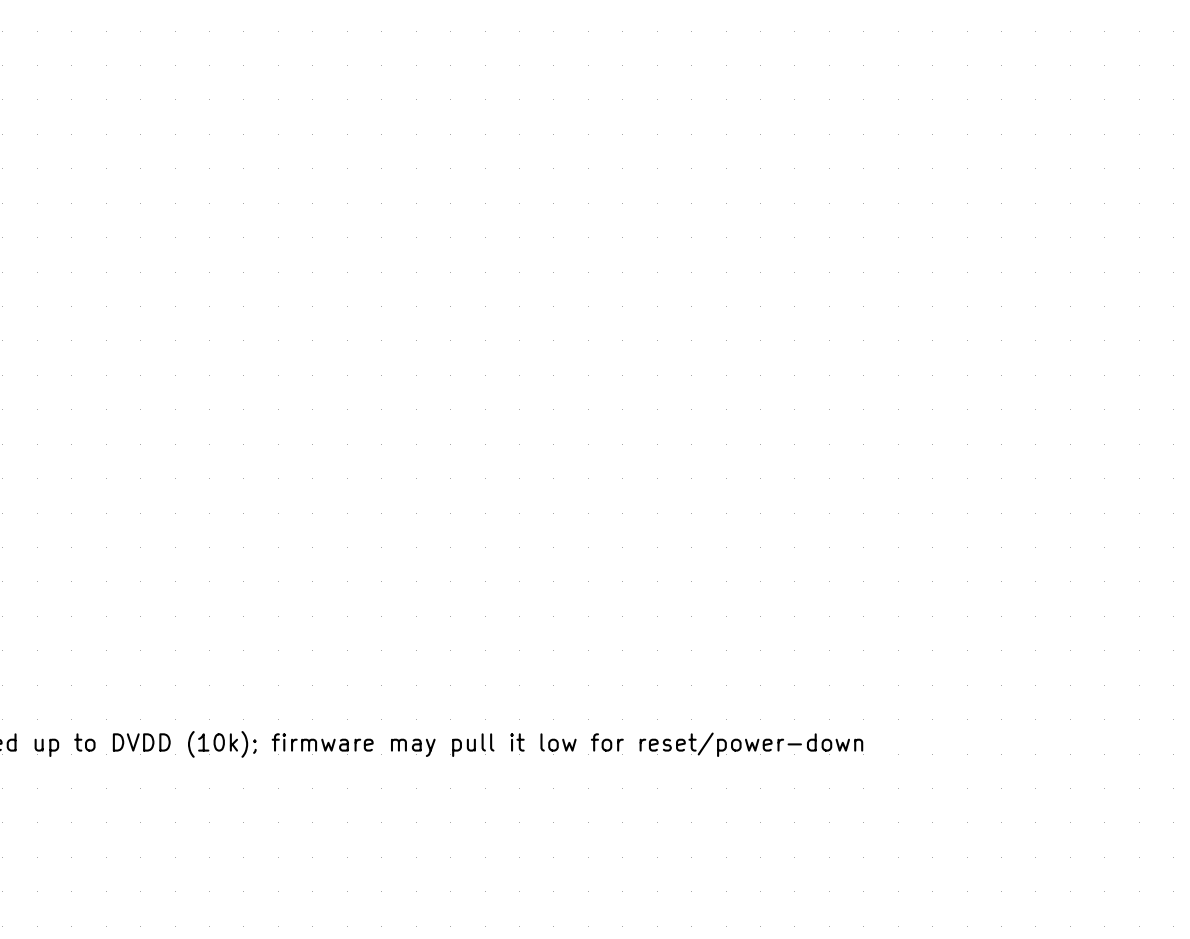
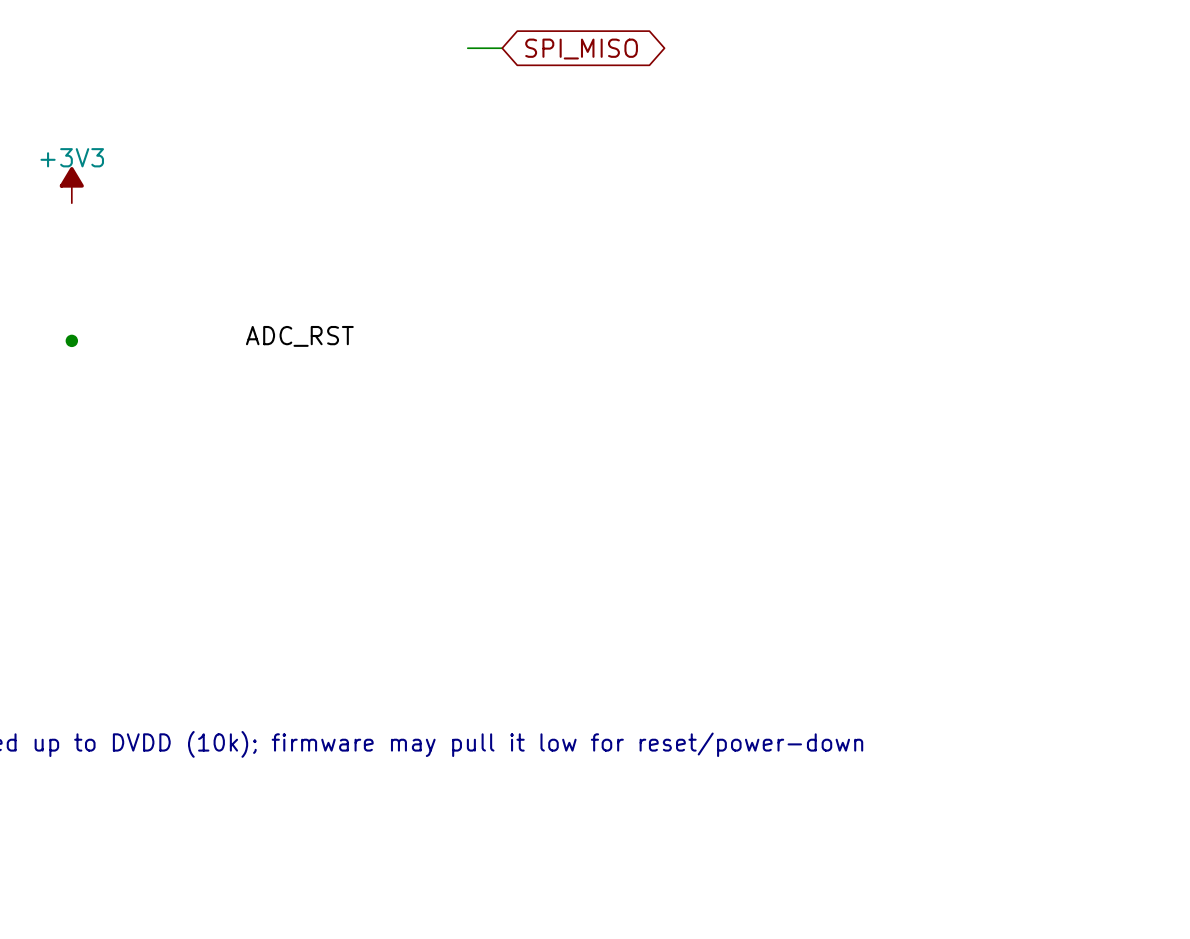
wire: none -> (467, 48) (502, 48)
global label: none -> SPI_MISO (581, 49)
power symbol: none -> +3V3 (71, 185)
label: none -> ADC_RST (299, 336)
junction: none -> (71, 340)

